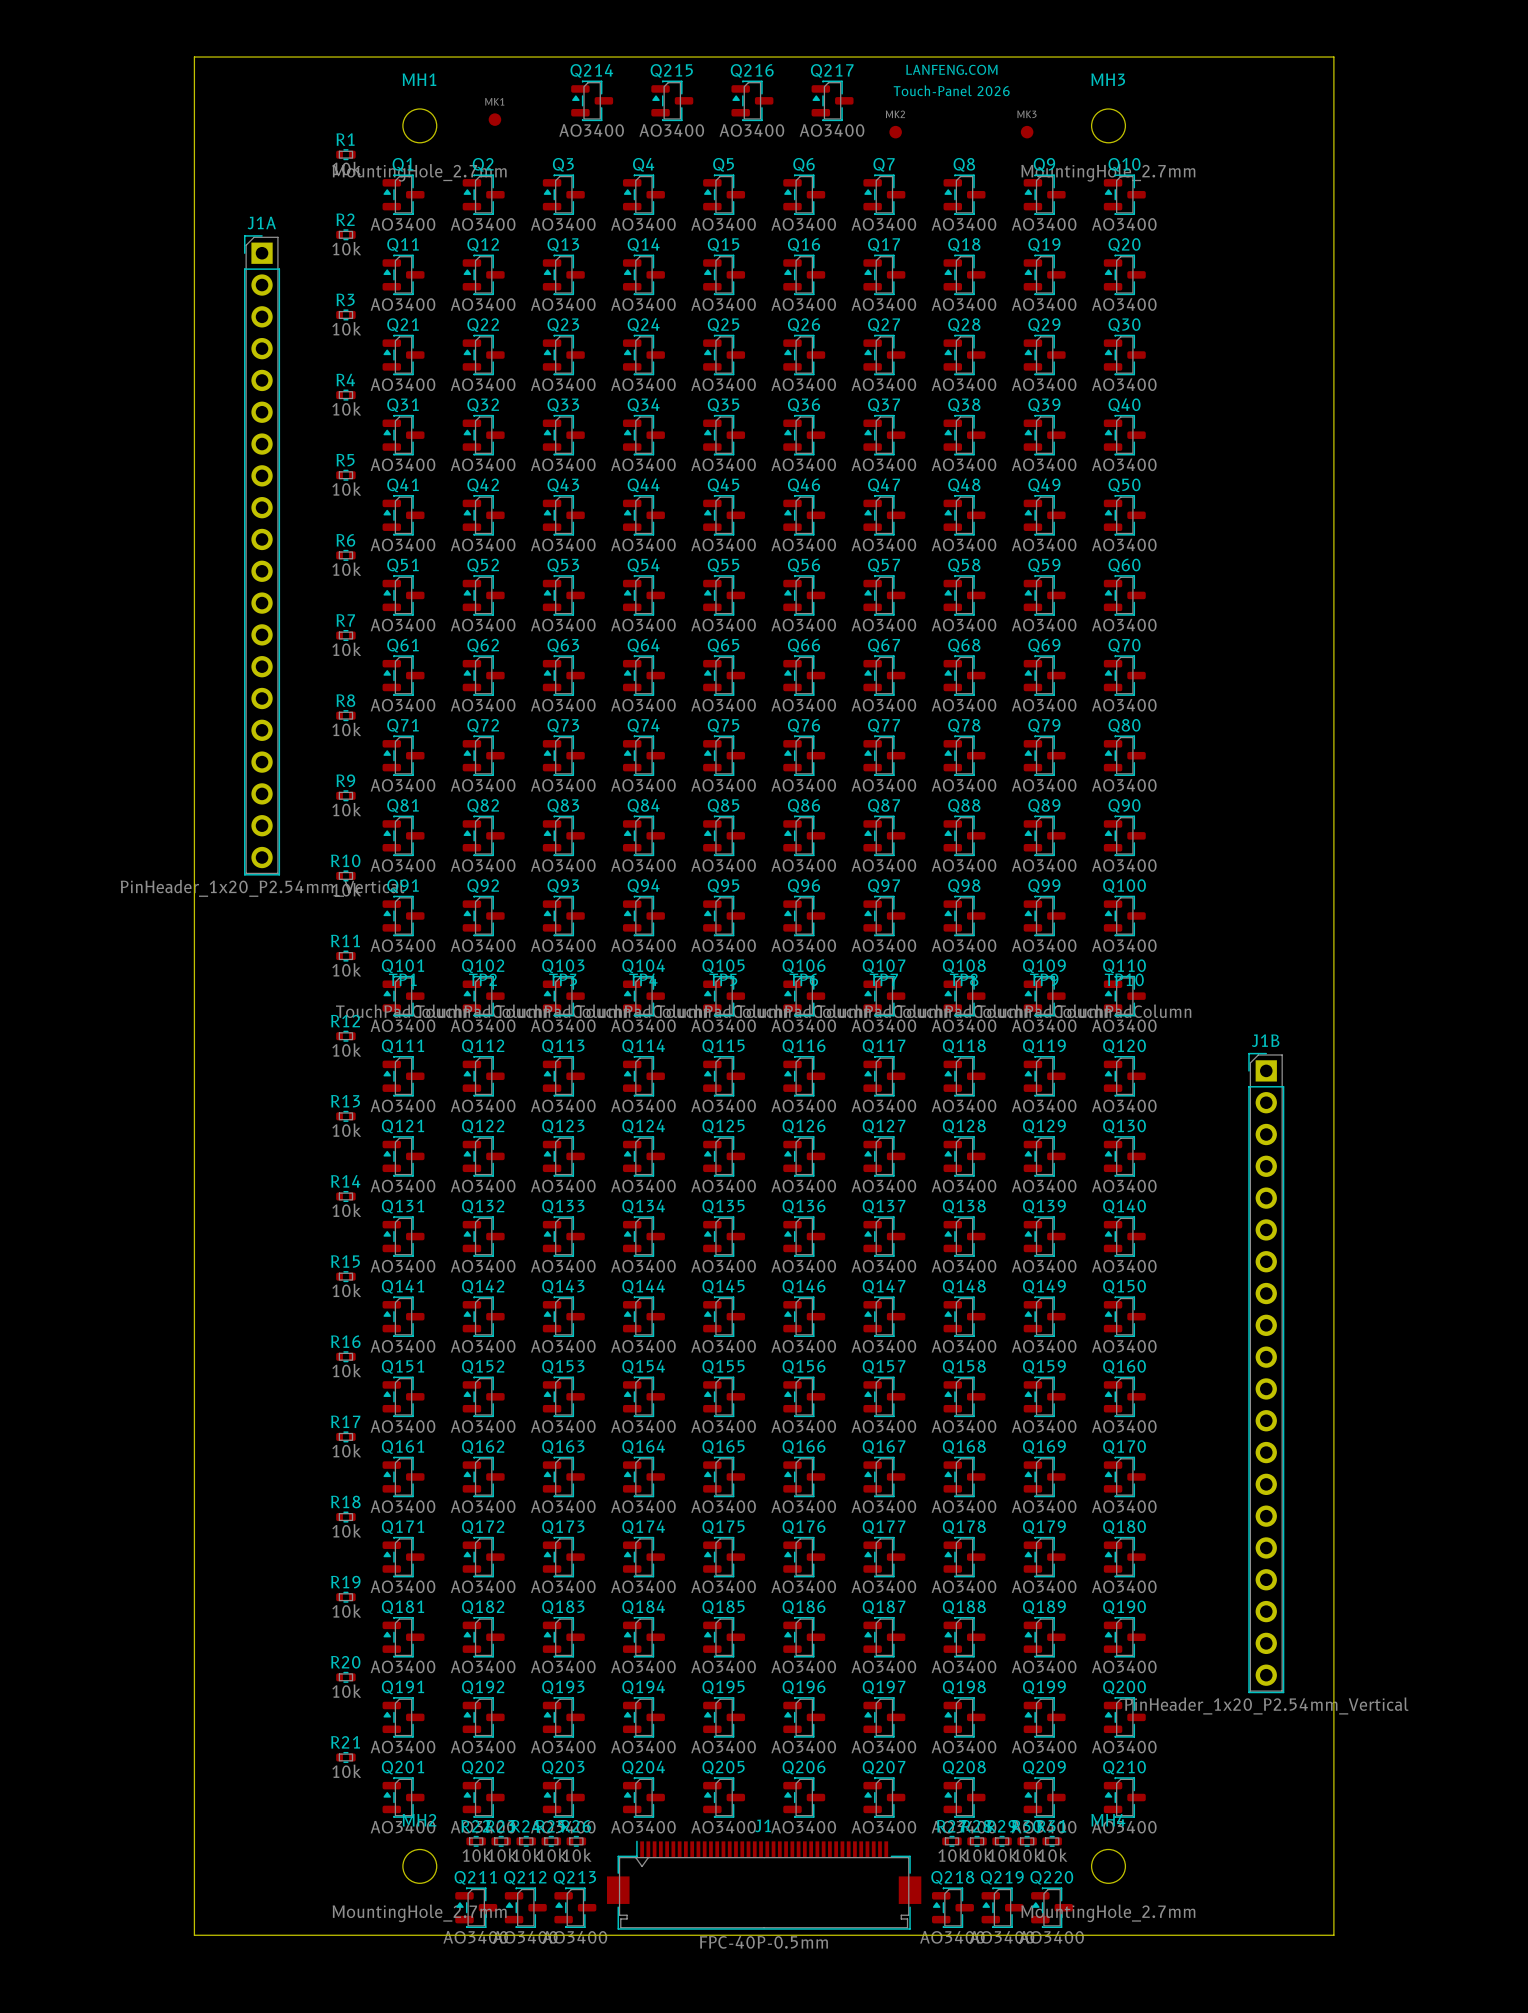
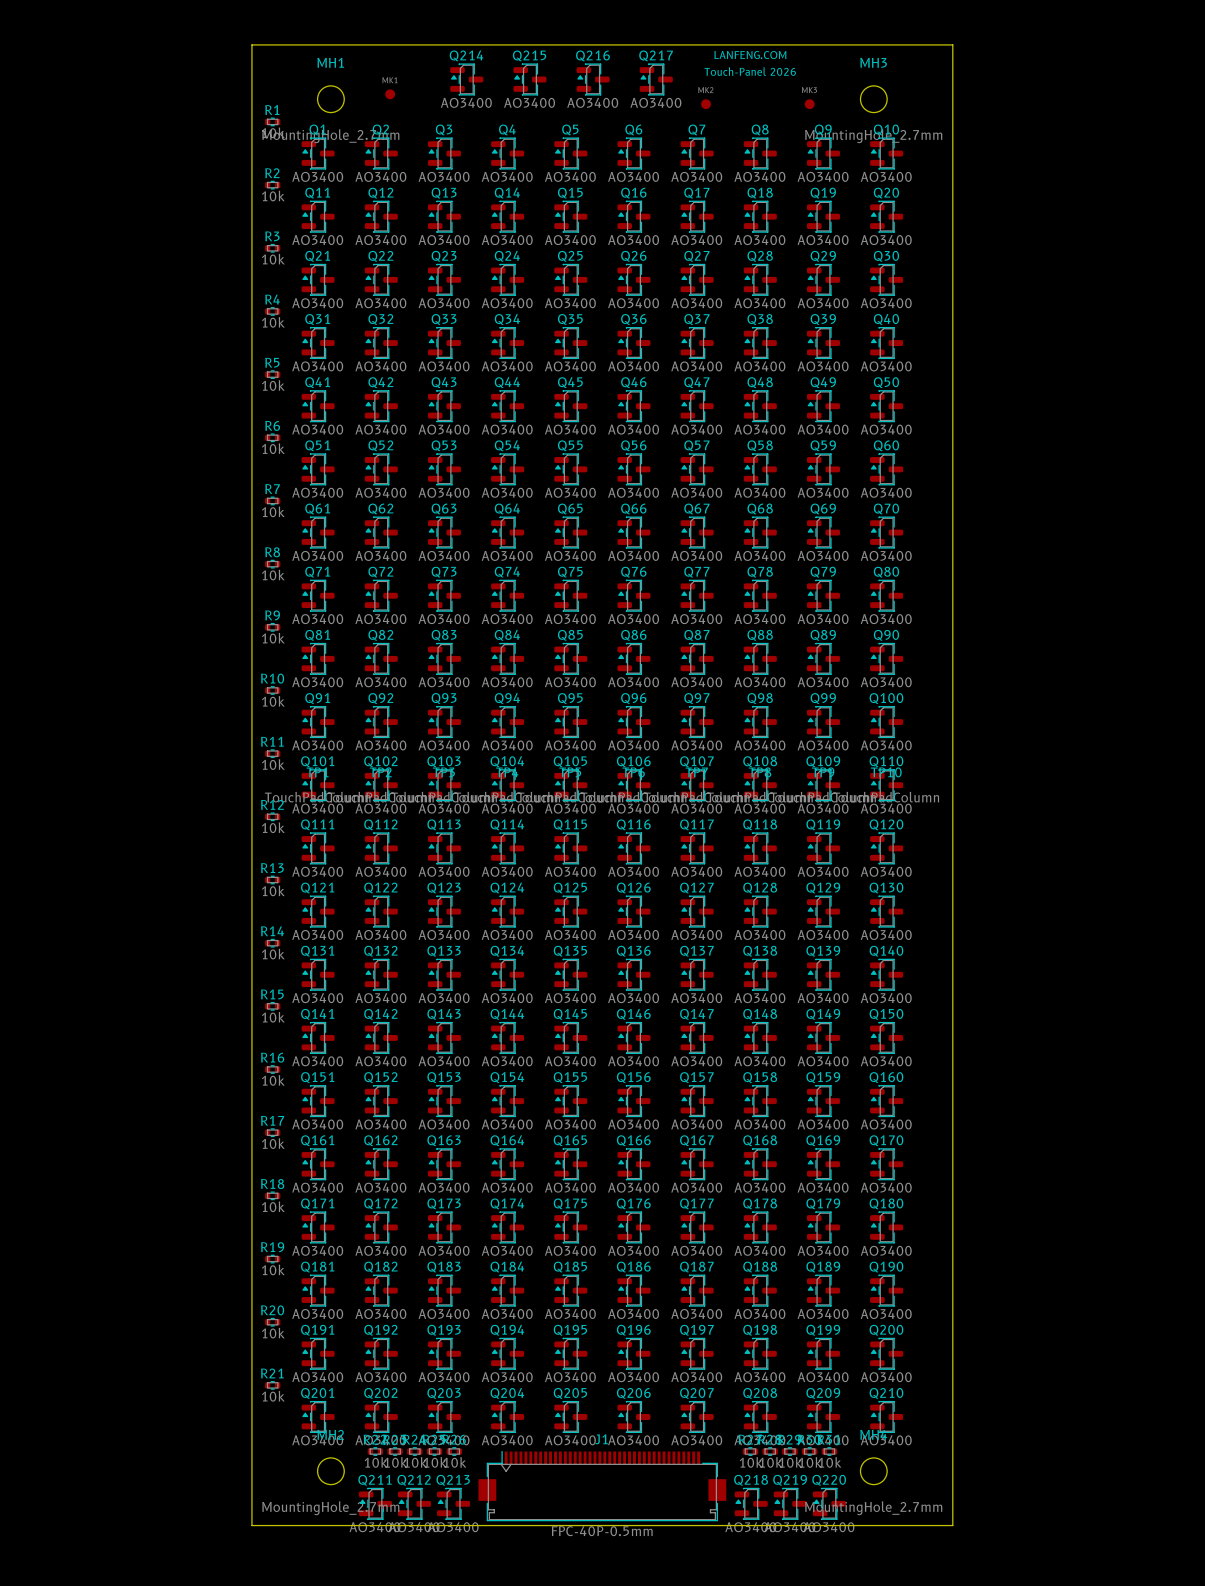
board edge: (319, 57) (194, 57) (194, 1935) (319, 1935) -> (251, 44) (251, 1525)
board edge: (1208, 57) (1333, 57) (1333, 1935) (1208, 1935) -> (952, 44) (952, 1525)
J1A: PinHeader_1x20_P2.54mm_Vertical (262, 555) -> none
J1B: PinHeader_1x20_P2.54mm_Vertical (1266, 1373) -> none

